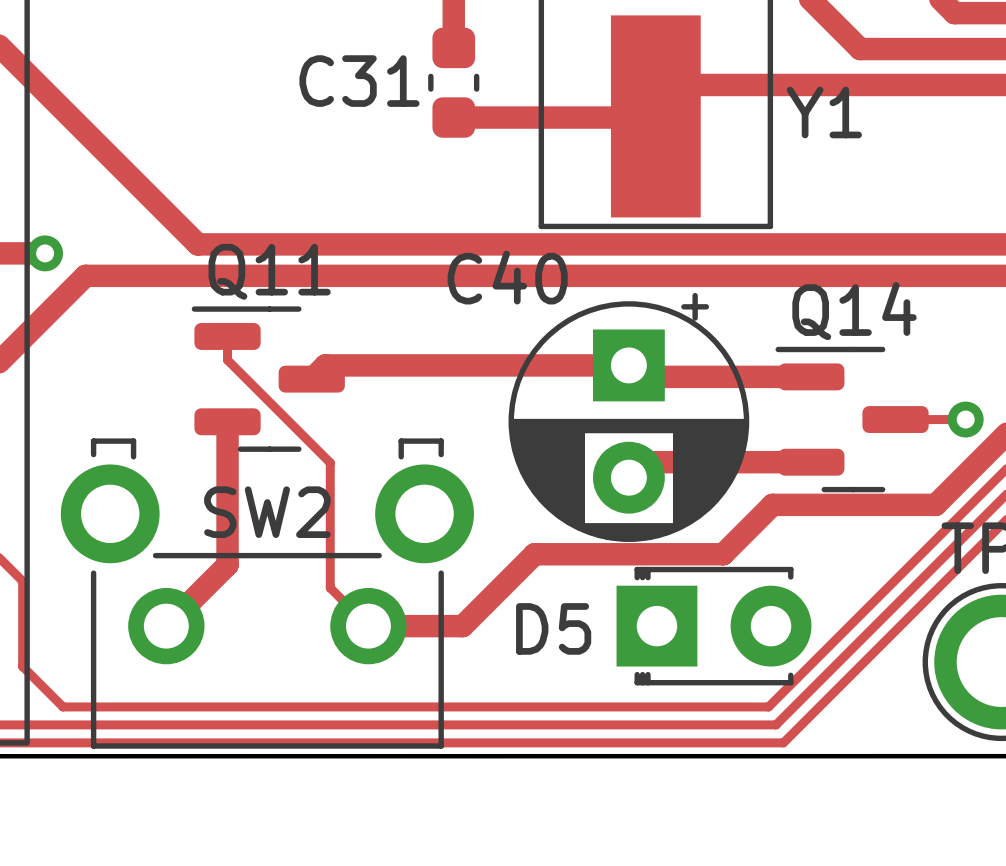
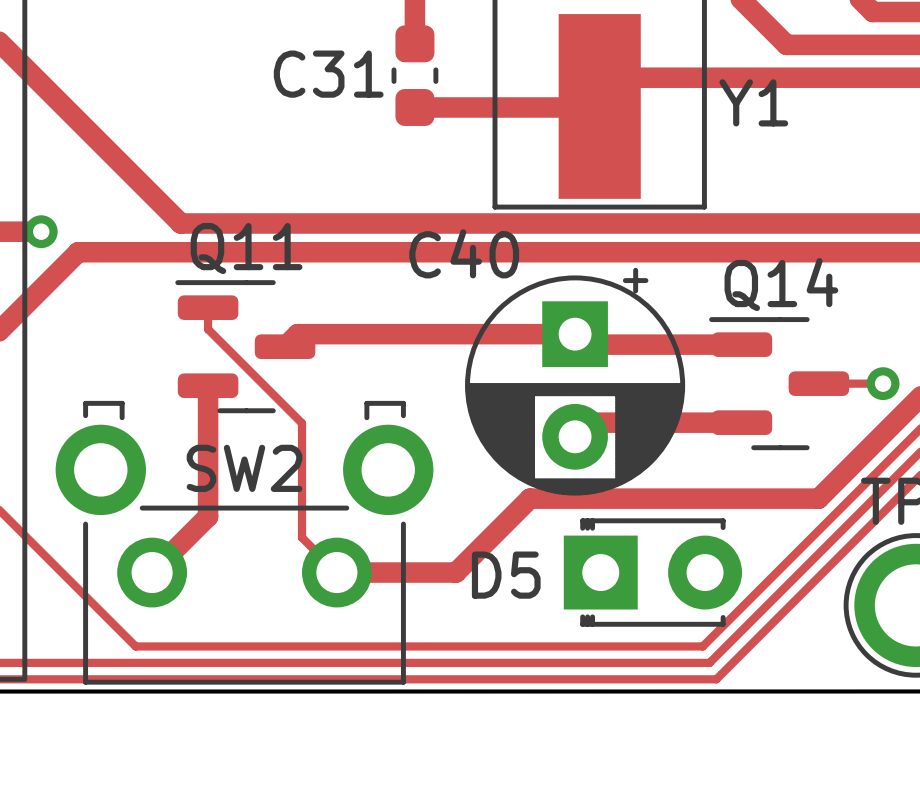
track: (935, 504) (772, 504) (723, 554) (534, 554) (462, 626) -> (855, 461) (818, 498) (529, 498) (455, 572) (423, 572)
track: (22, 581) (22, 666) (63, 706) (148, 706) -> (20, 531) (135, 646)

